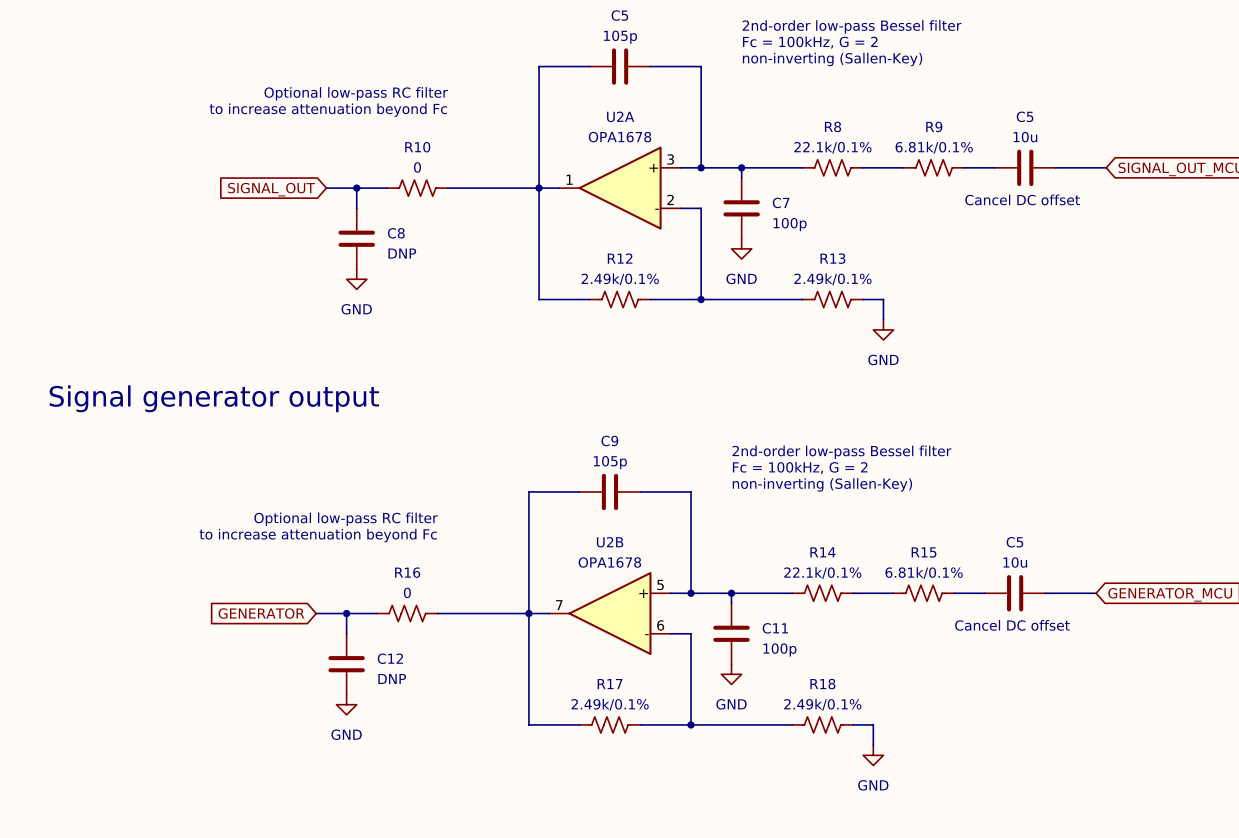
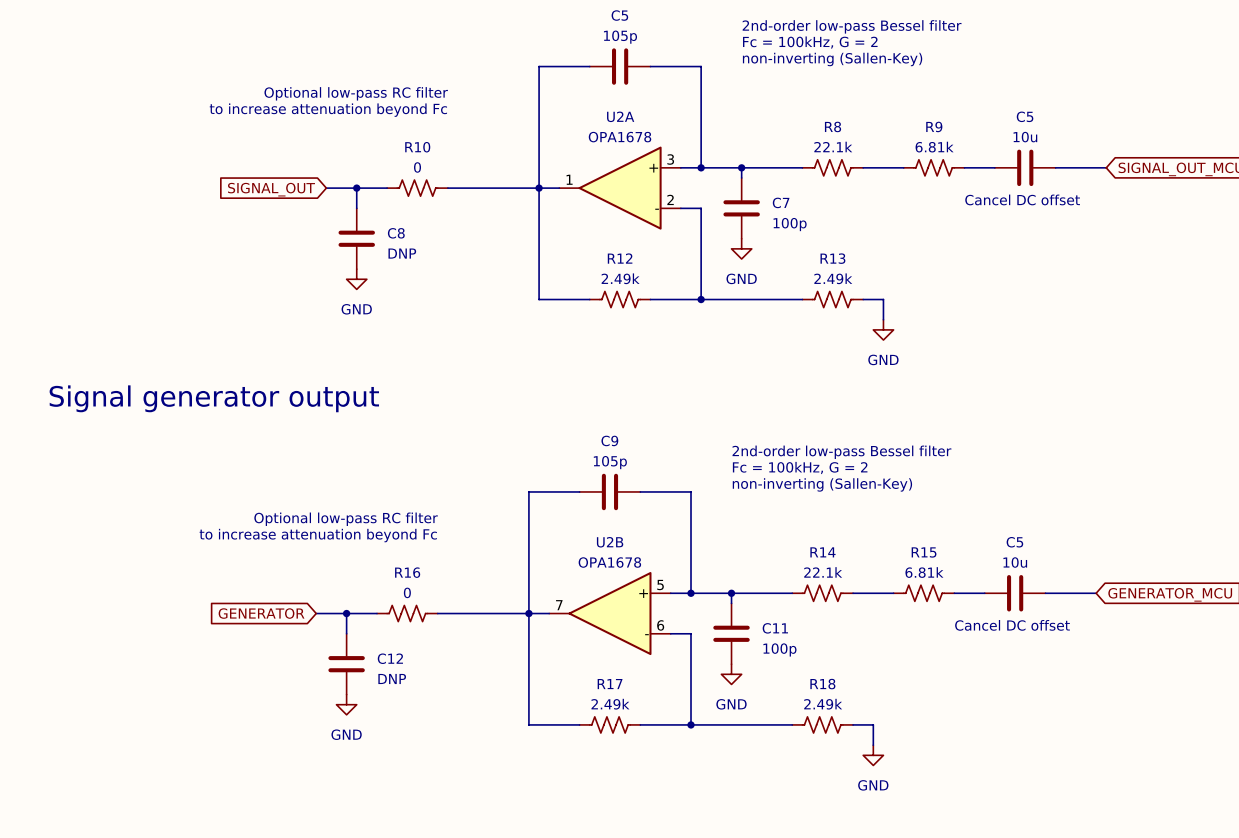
R8 value: 22.1k/0.1% (832, 147) -> 22.1k (833, 147)
R9 value: 6.81k/0.1% (934, 147) -> 6.81k (934, 147)
R12 value: 2.49k/0.1% (620, 279) -> 2.49k (620, 278)
R13 value: 2.49k/0.1% (832, 279) -> 2.49k (833, 278)
R14 value: 22.1k/0.1% (822, 573) -> 22.1k (823, 572)
R15 value: 6.81k/0.1% (924, 573) -> 6.81k (924, 572)
R17 value: 2.49k/0.1% (610, 704) -> 2.49k (610, 704)
R18 value: 2.49k/0.1% (822, 704) -> 2.49k (823, 704)

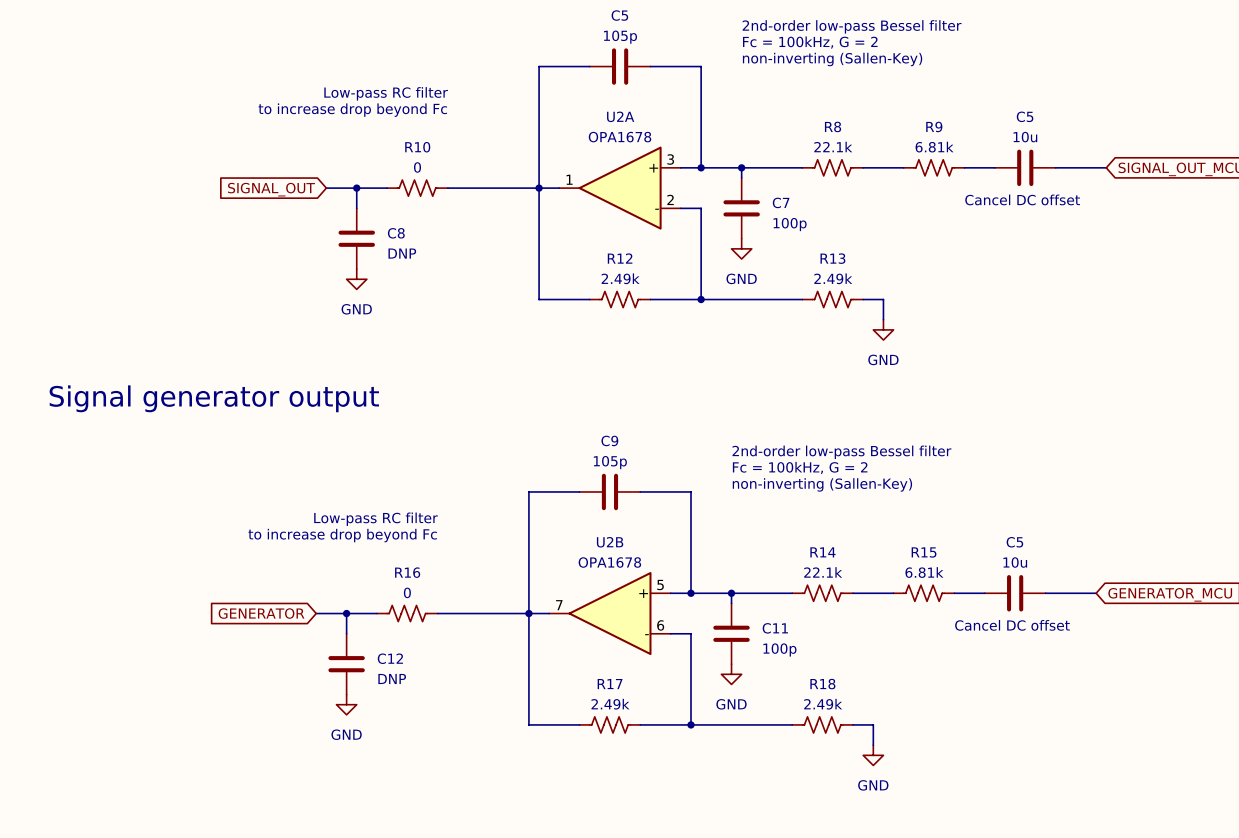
text: Optional low-pass RC filter (356, 93) -> Low-pass RC filter (386, 93)
text: to increase attenuation beyond Fc (328, 110) -> to increase drop beyond Fc (352, 110)
text: Optional low-pass RC filter (346, 519) -> Low-pass RC filter (375, 519)
text: to increase attenuation beyond Fc (318, 535) -> to increase drop beyond Fc (342, 535)

